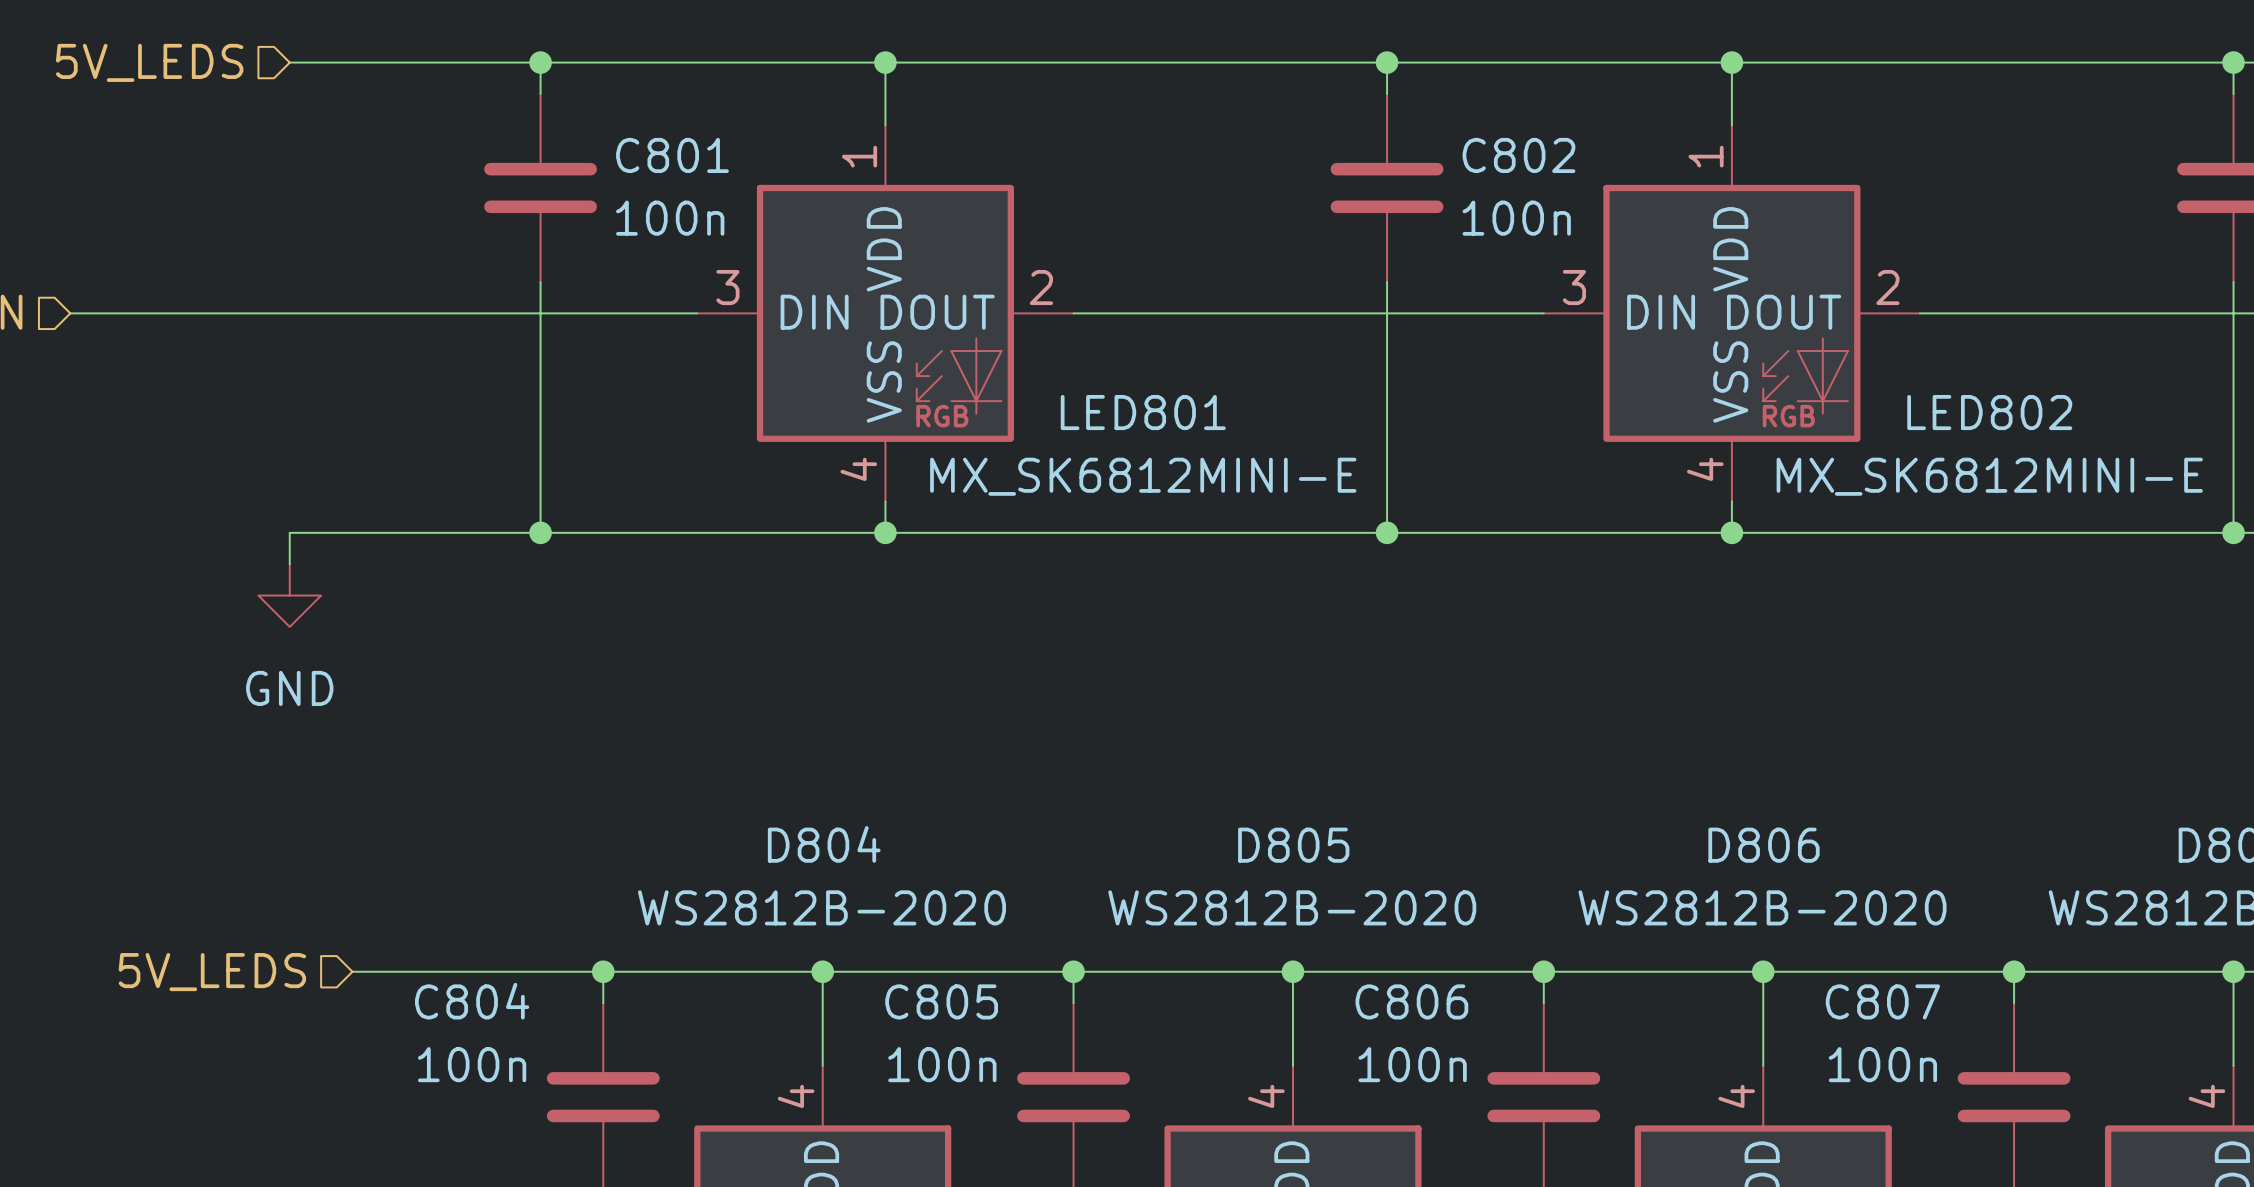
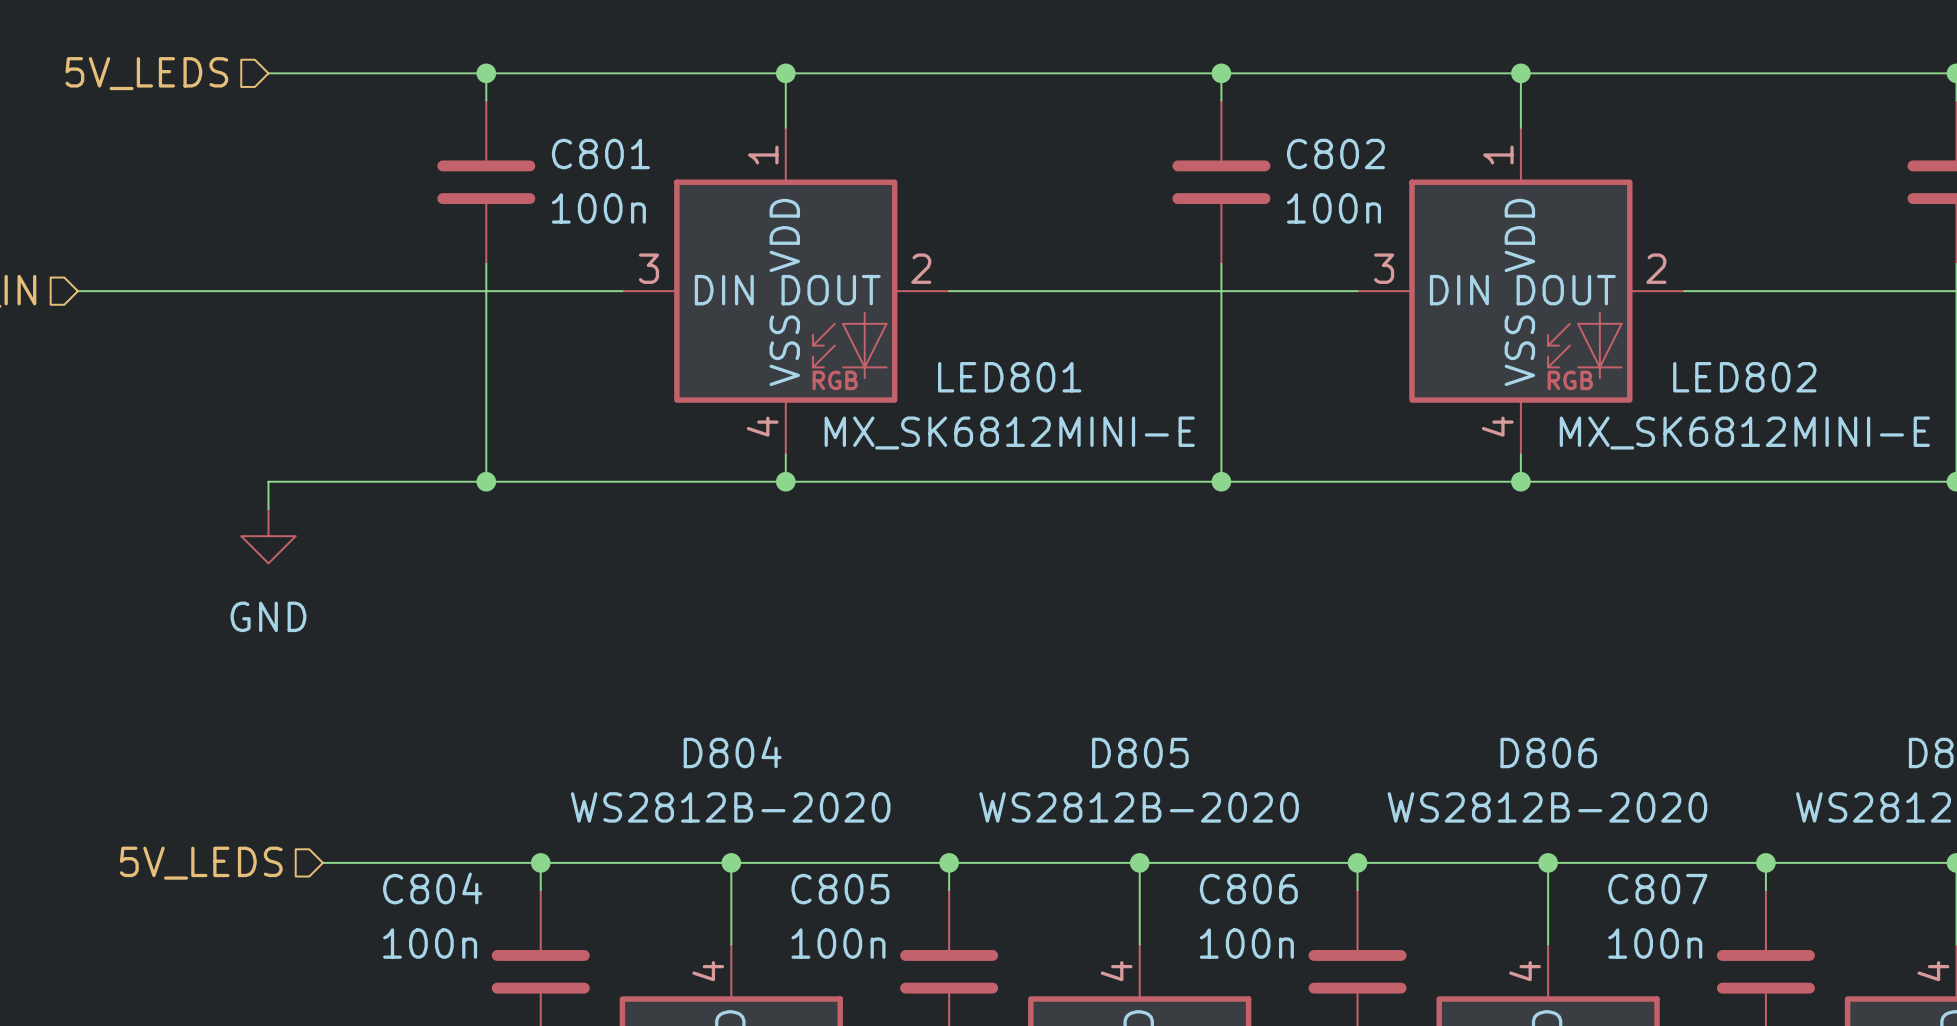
C804 name position: C804 (472, 1001) -> C804 (432, 888)
C805 name position: C805 (941, 1001) -> C805 (840, 889)
C806 name position: C806 (1411, 1001) -> C806 (1248, 889)
C807 name position: C807 (1882, 1001) -> C807 (1657, 889)
C804 value position: 100n (472, 1064) -> 100n (430, 943)
C805 value position: 100n (942, 1064) -> 100n (838, 943)
C806 value position: 100n (1412, 1064) -> 100n (1246, 943)
C807 value position: 100n (1882, 1064) -> 100n (1655, 943)

